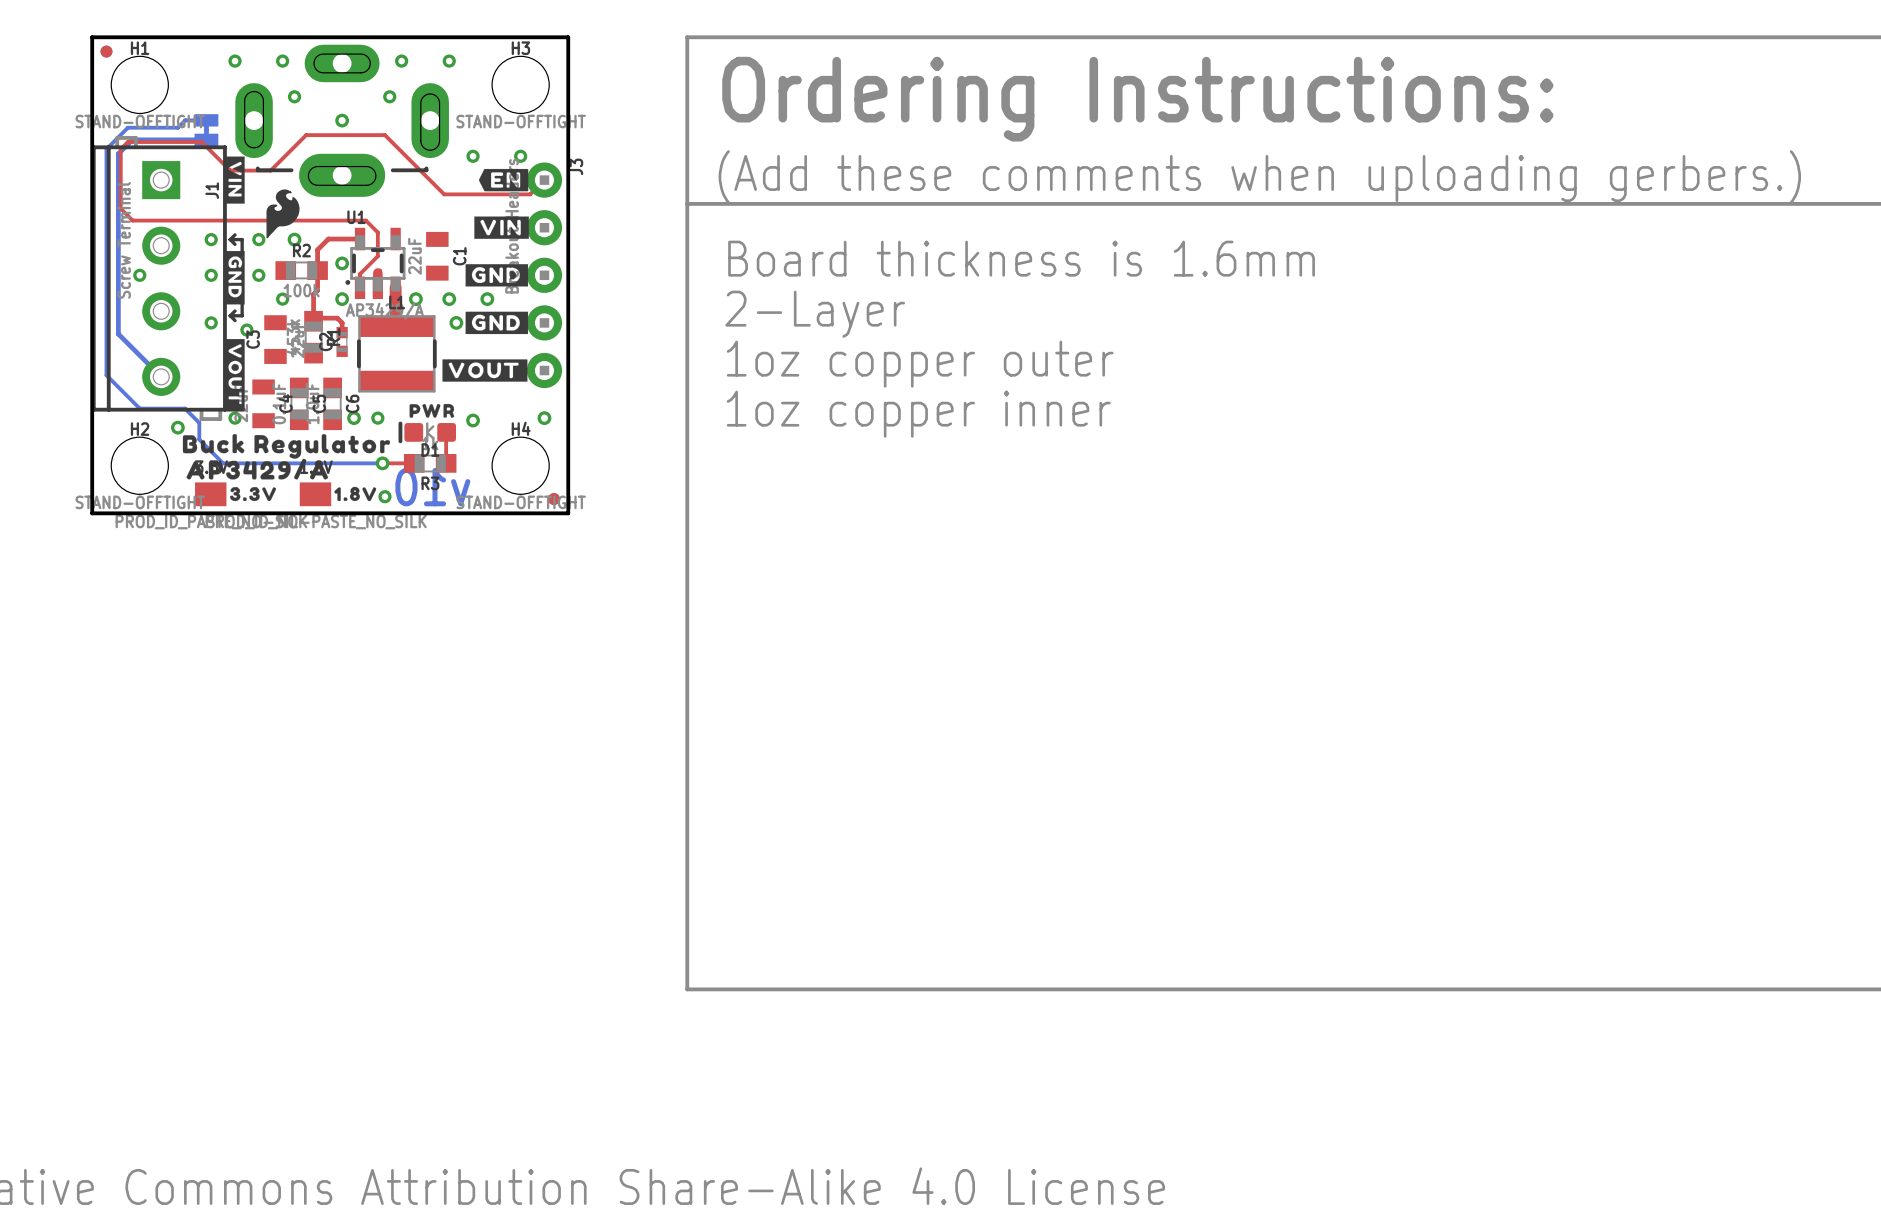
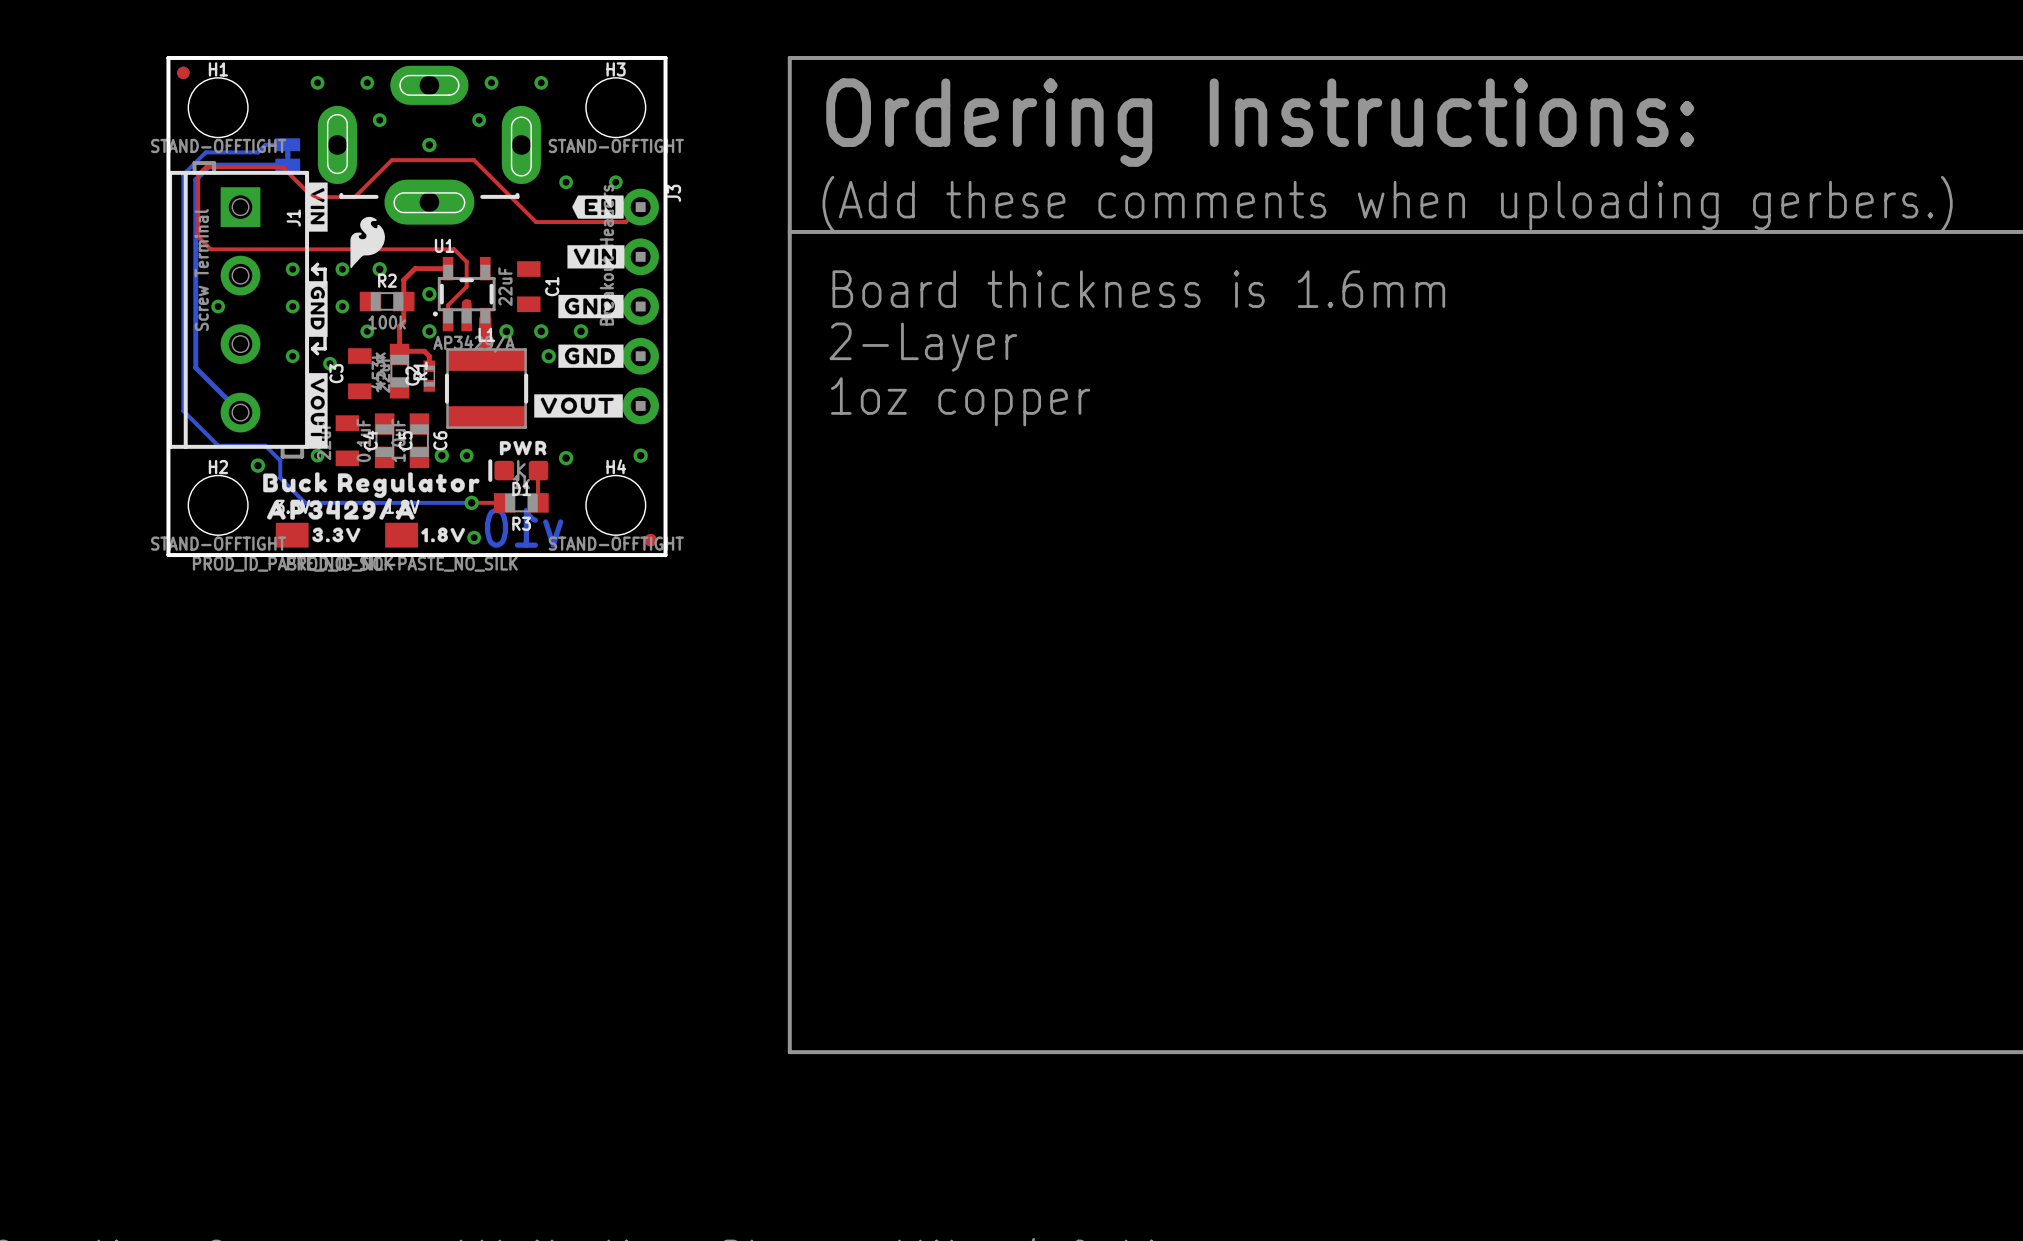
text: 1oz copper outer (920, 364) -> 1oz copper (960, 401)
text: 1oz copper inner (918, 414) -> none

